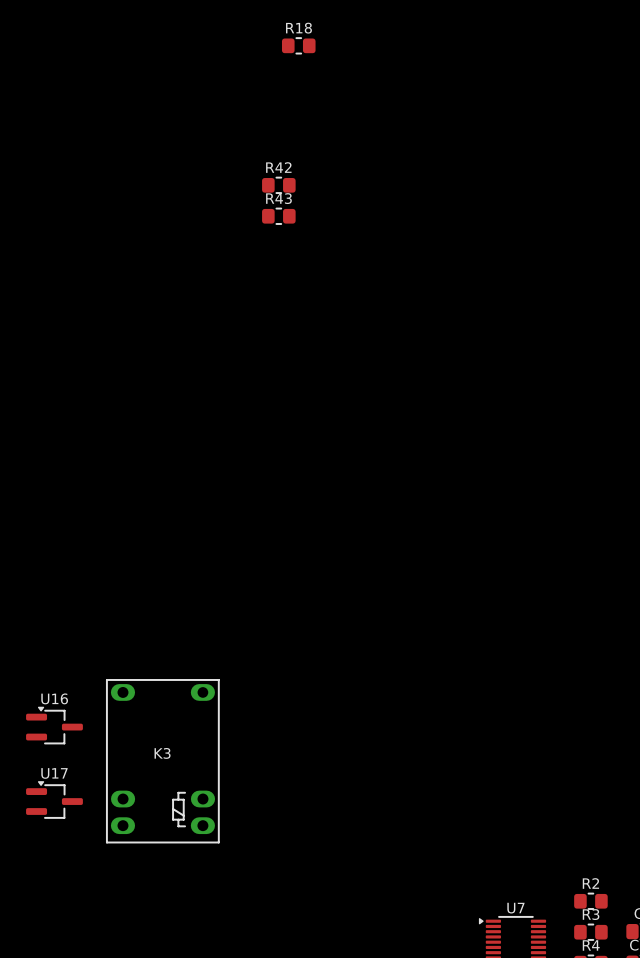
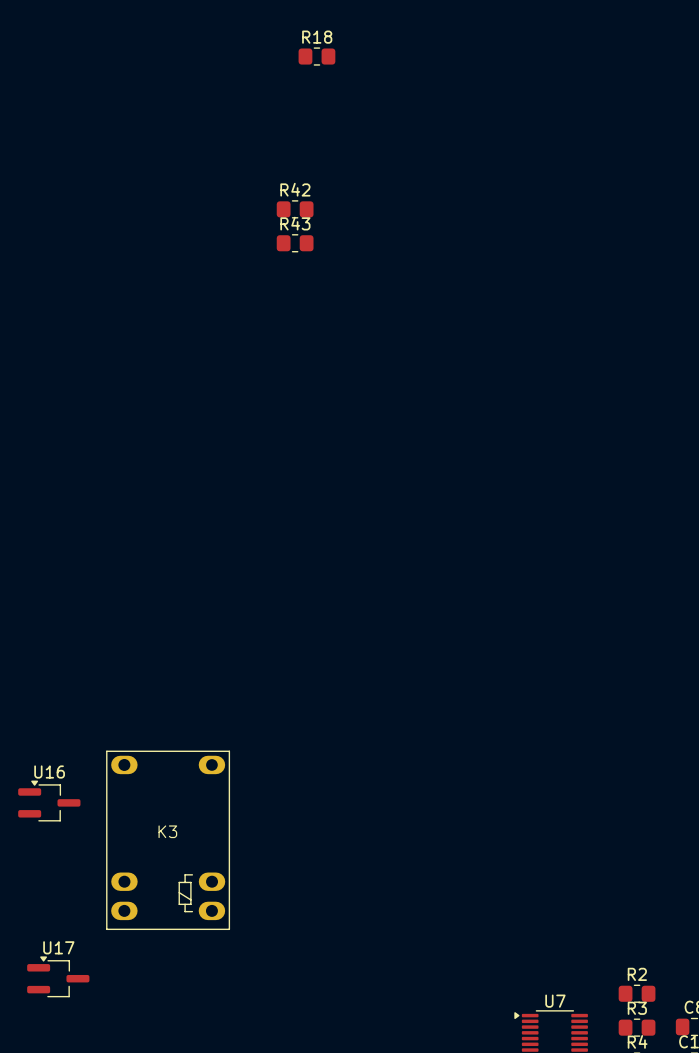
U17 position: (54, 799) -> (58, 976)

